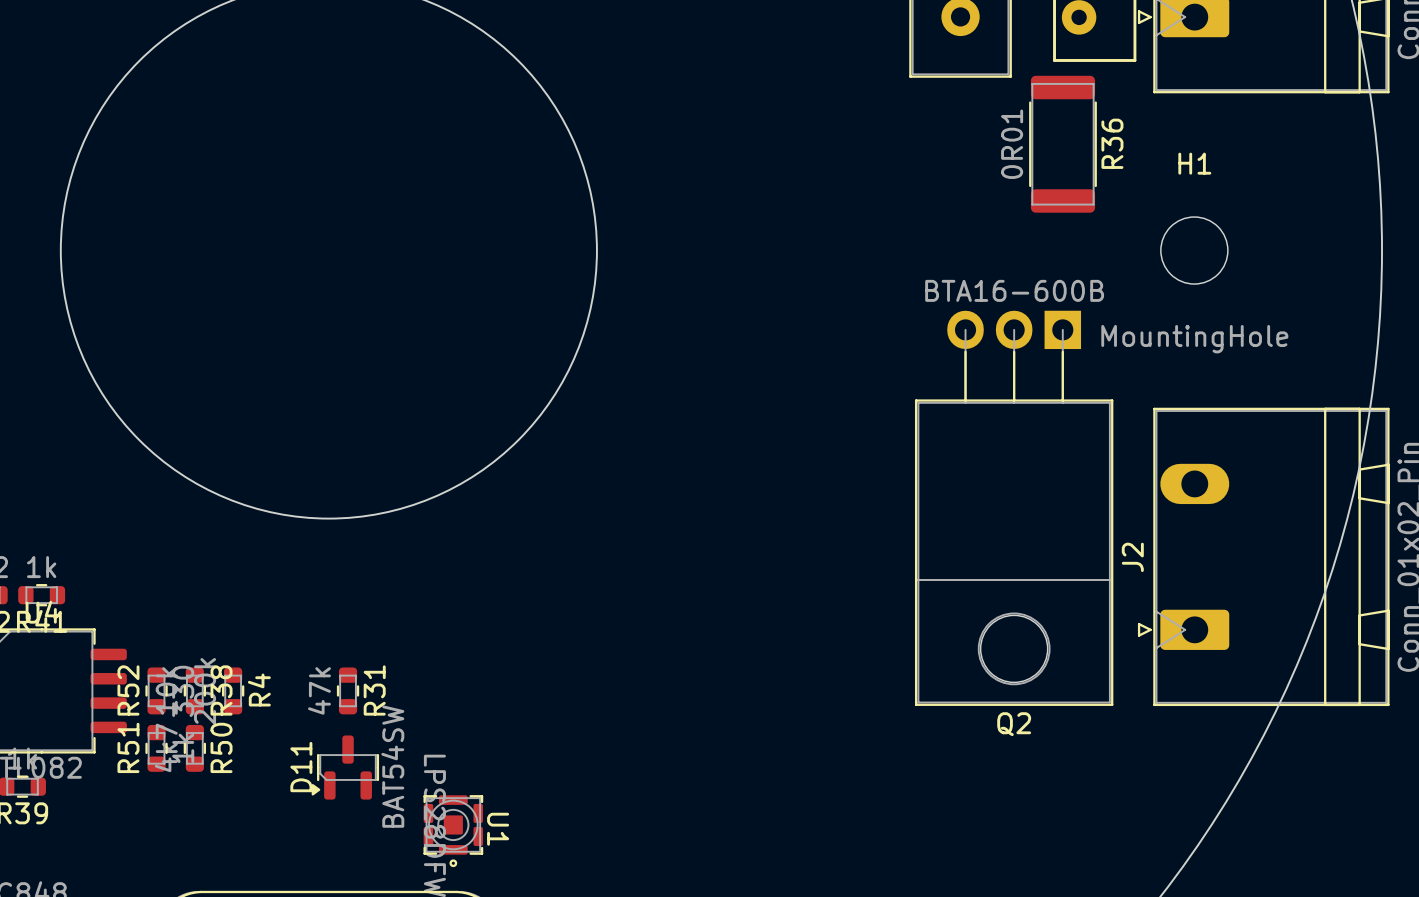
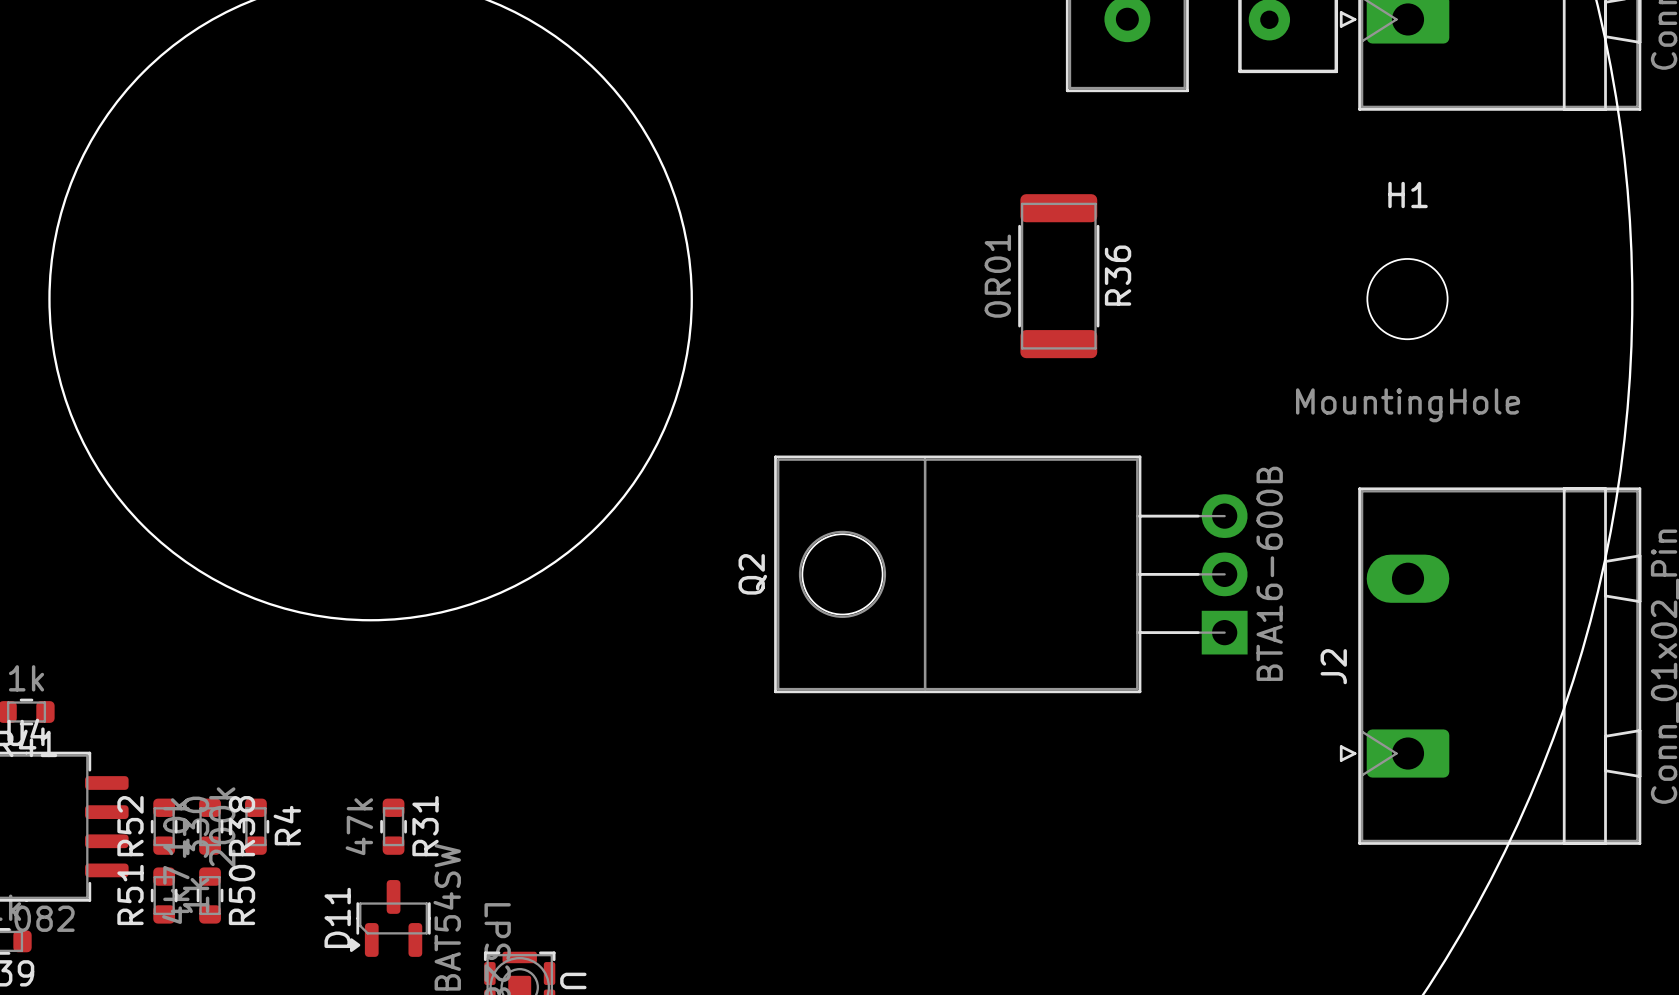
R36 position: (1062, 144) -> (1058, 276)
Q2 rotation: 0° (1014, 508) -> 90° clockwise (1010, 574)

